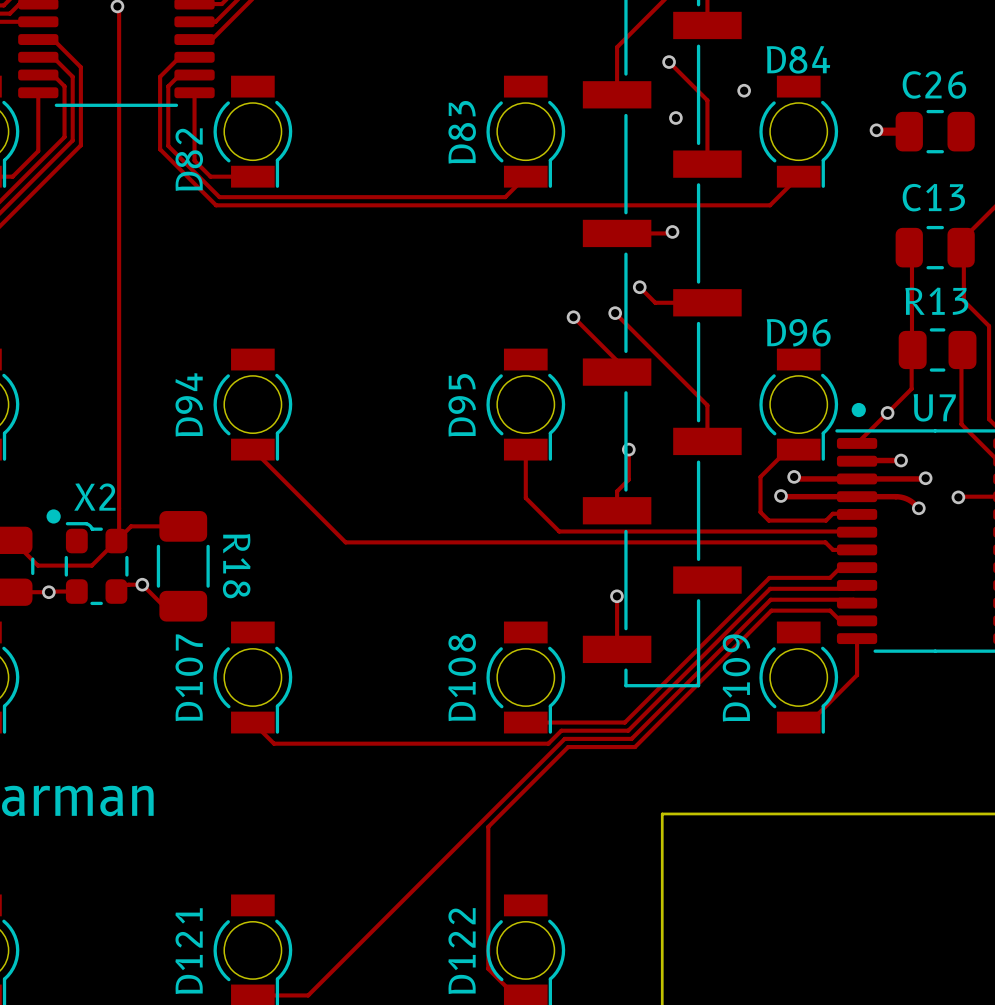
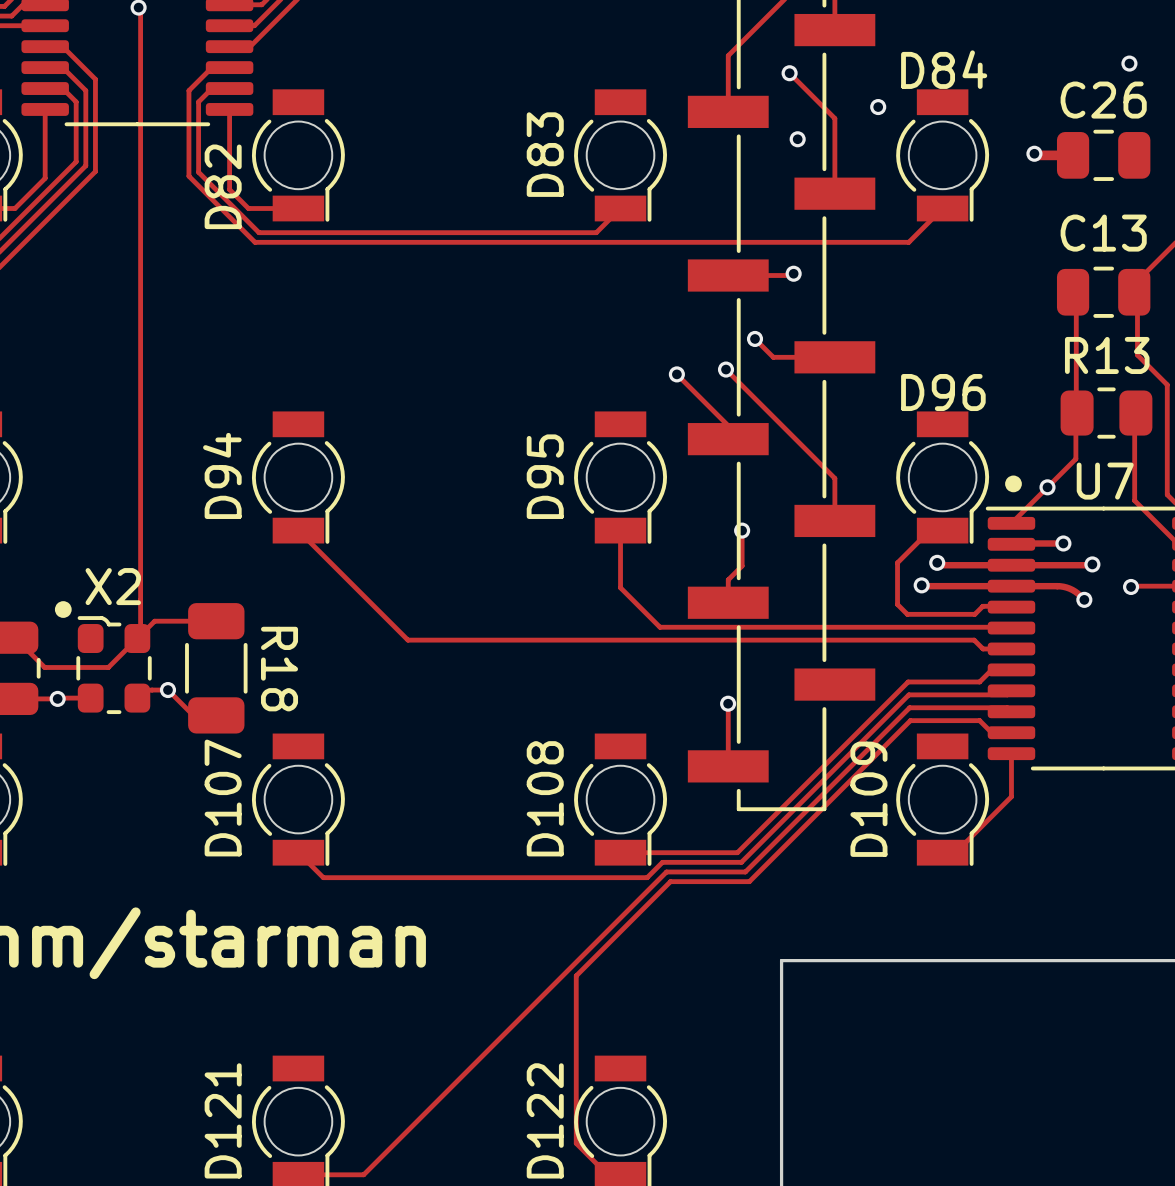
via: none -> (1129, 63)

